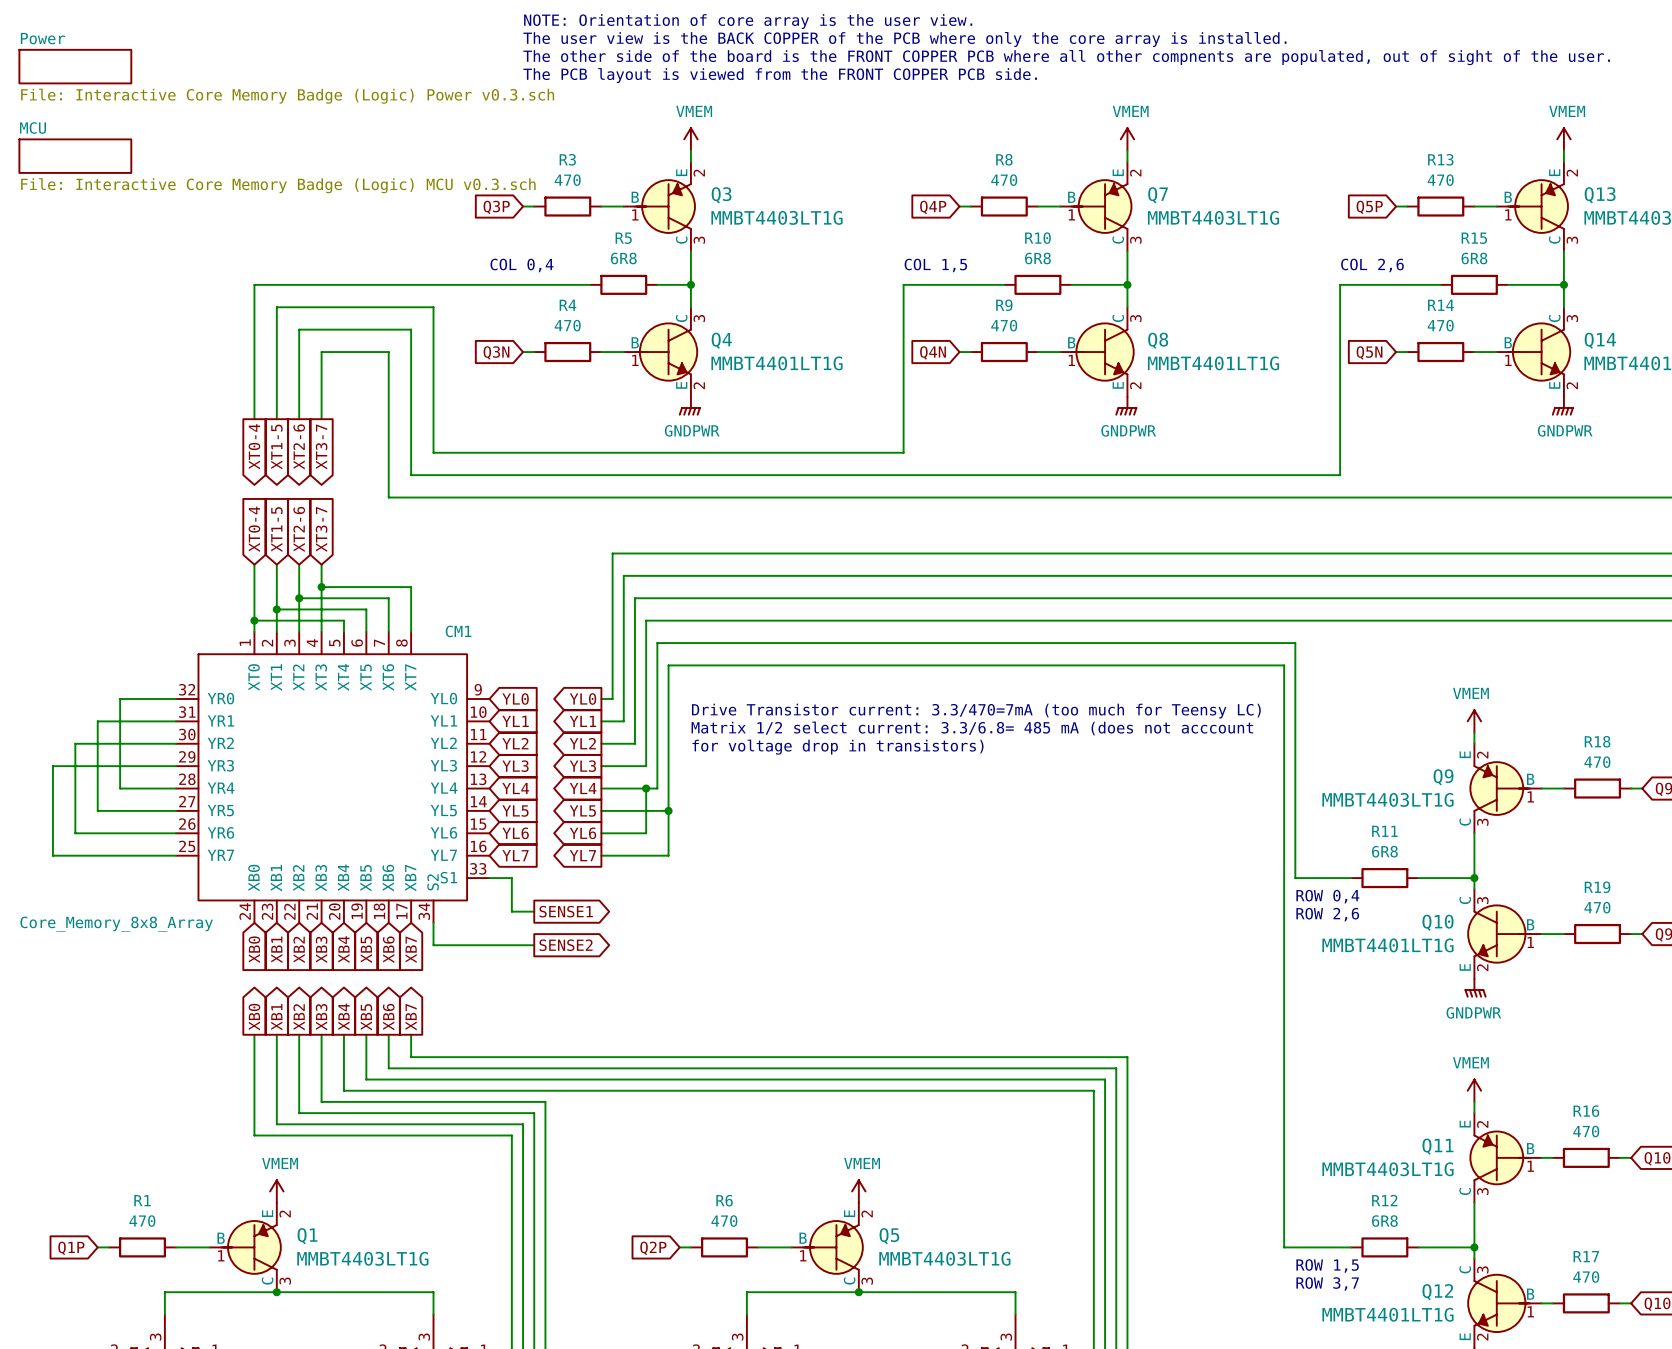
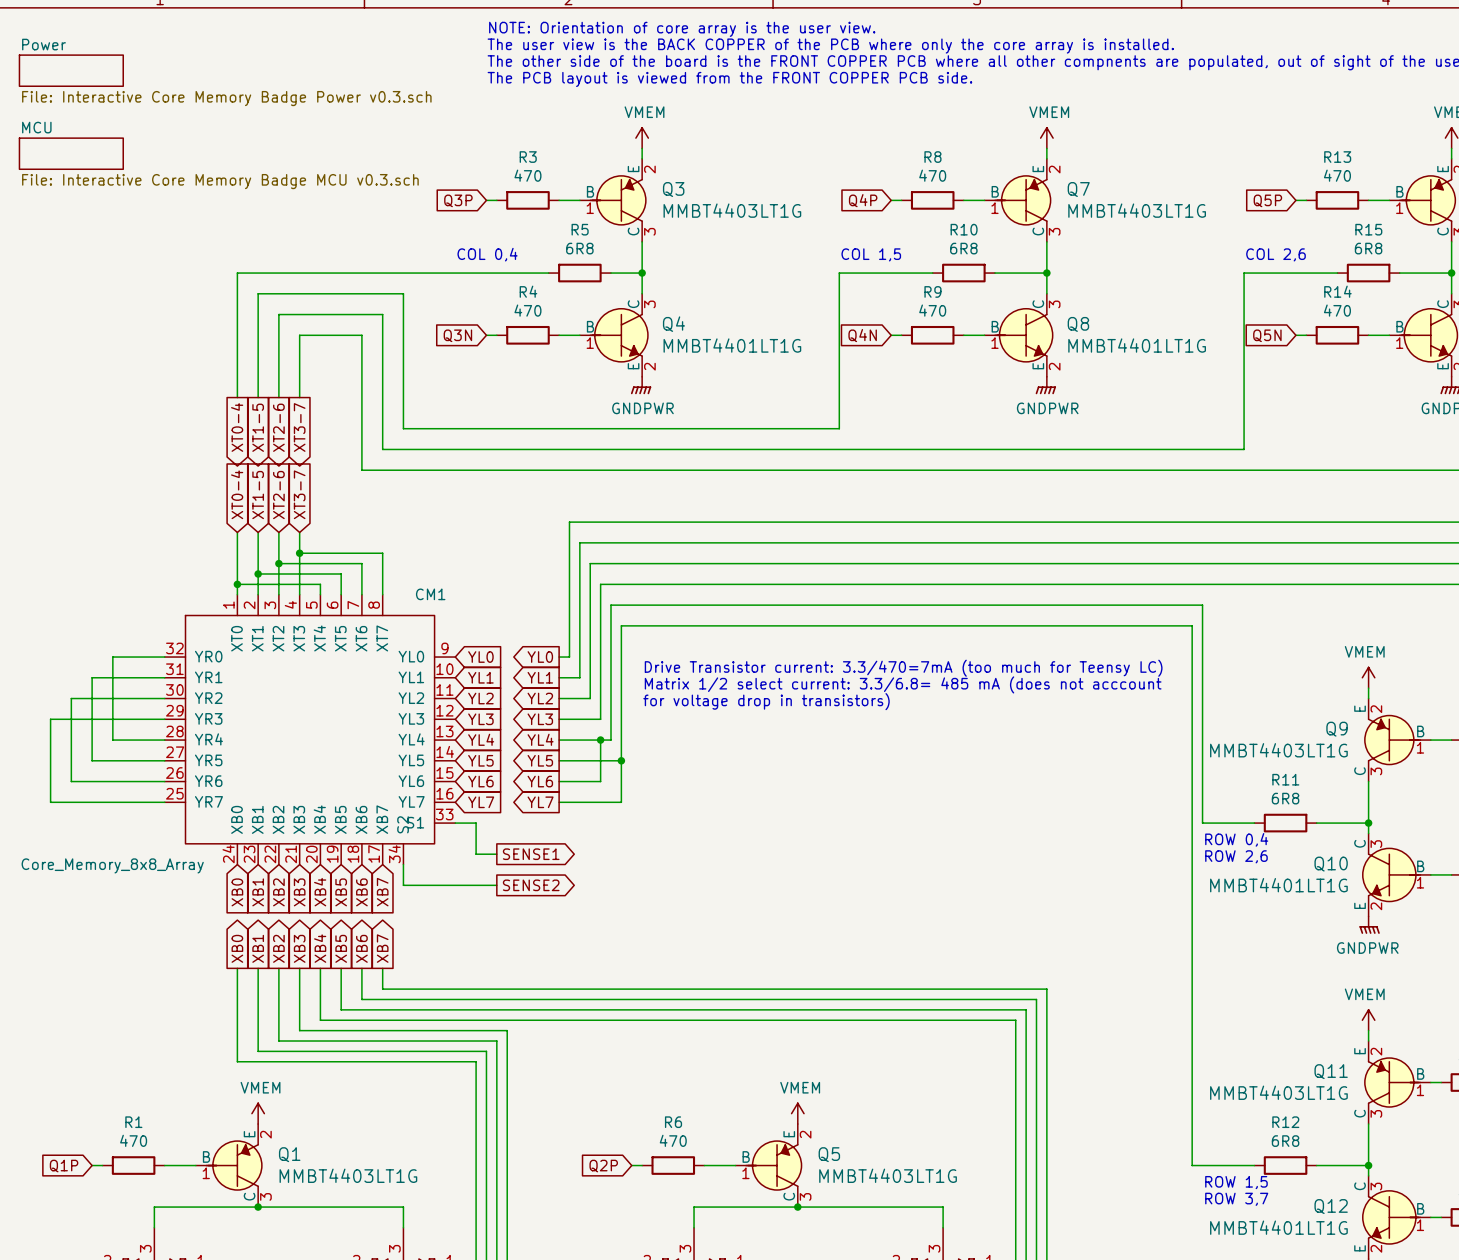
sheet Power value: File: Interactive Core Memory Badge (Logic) Power v0.3.sch (287, 96) -> File: Interactive Core Memory Badge Power v0.3.sch (226, 98)
sheet MCU value: File: Interactive Core Memory Badge (Logic) MCU v0.3.sch (278, 185) -> File: Interactive Core Memory Badge MCU v0.3.sch (220, 181)

